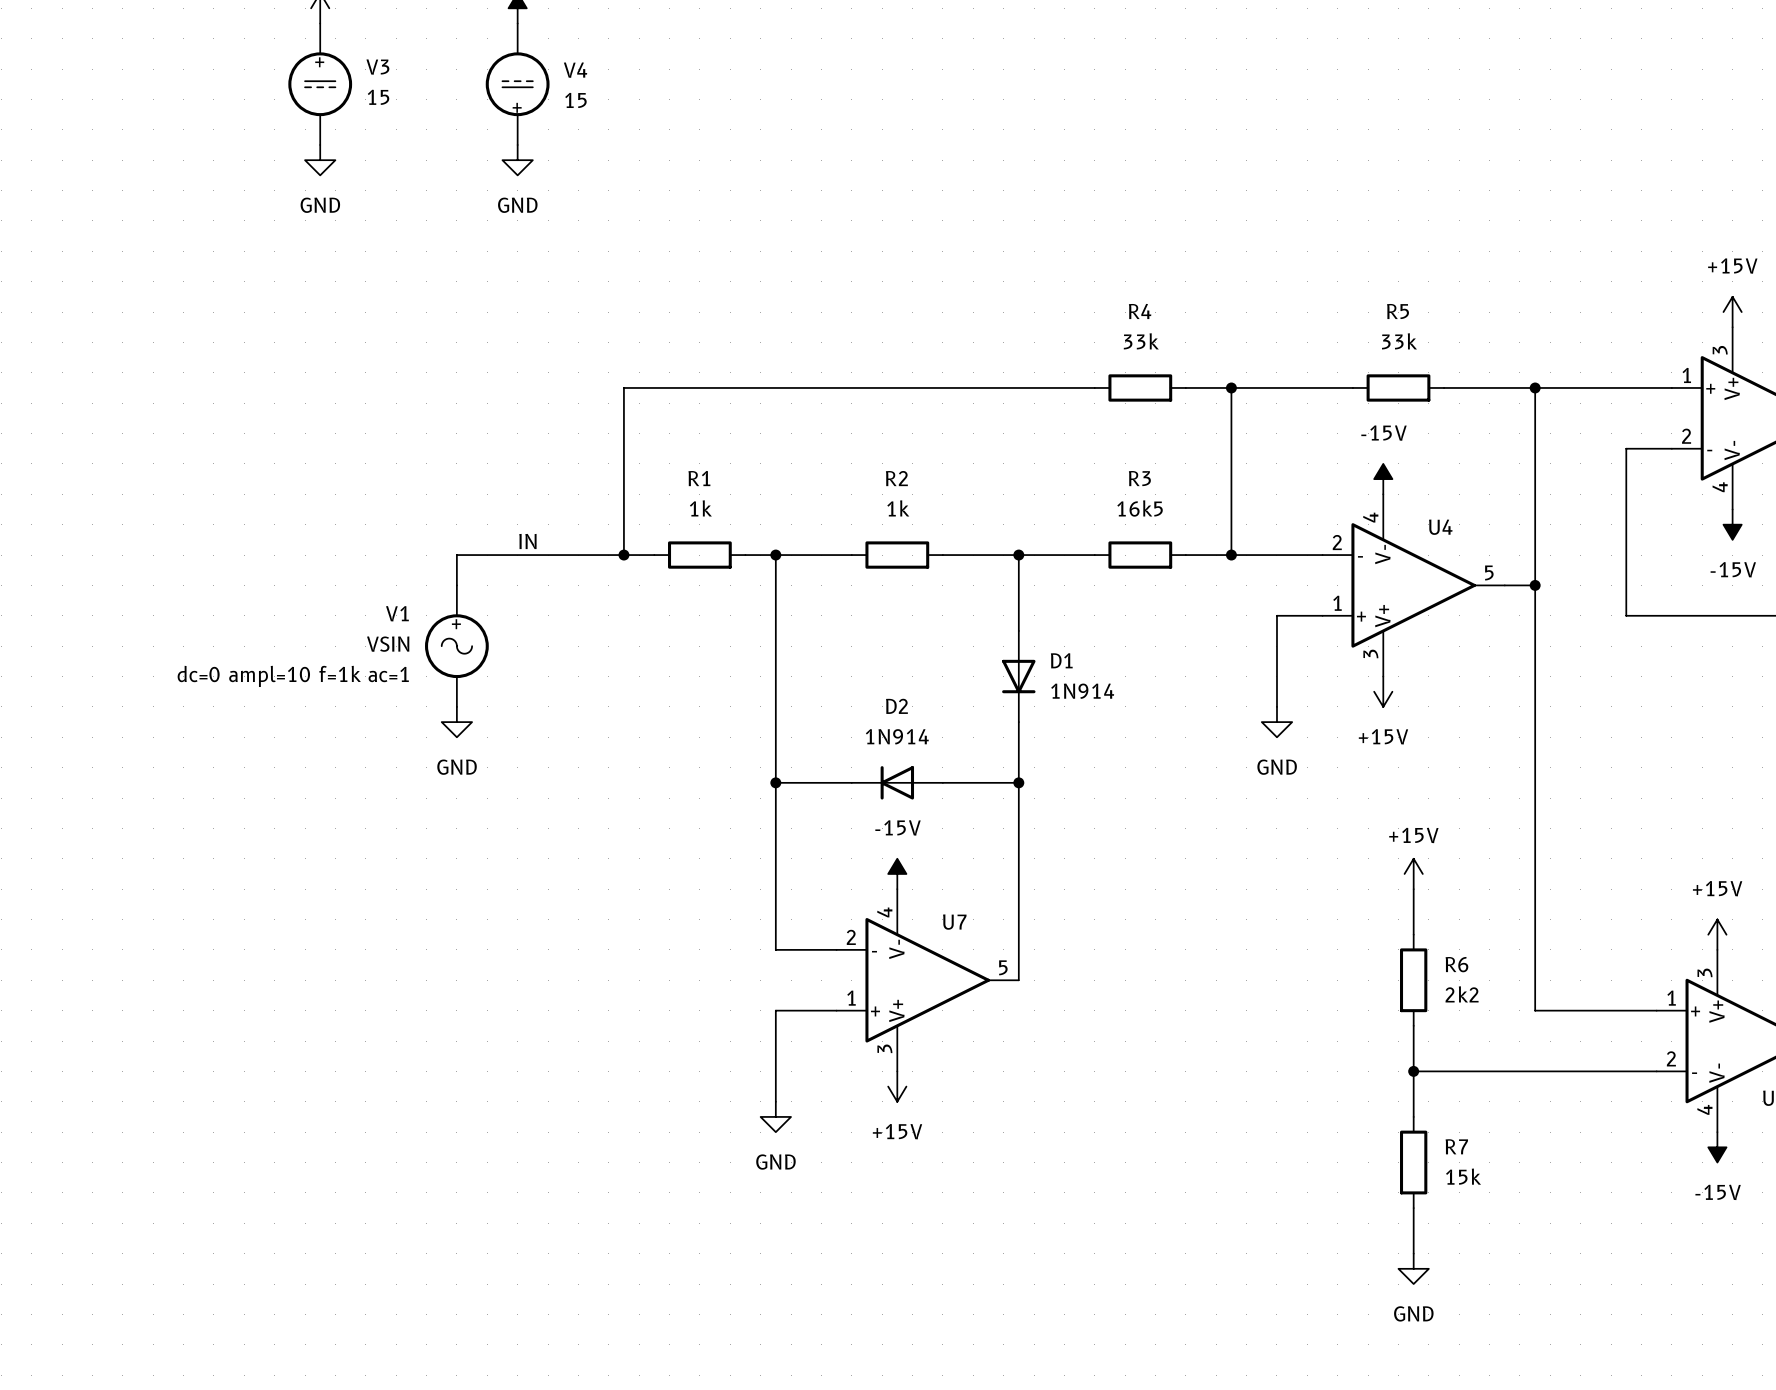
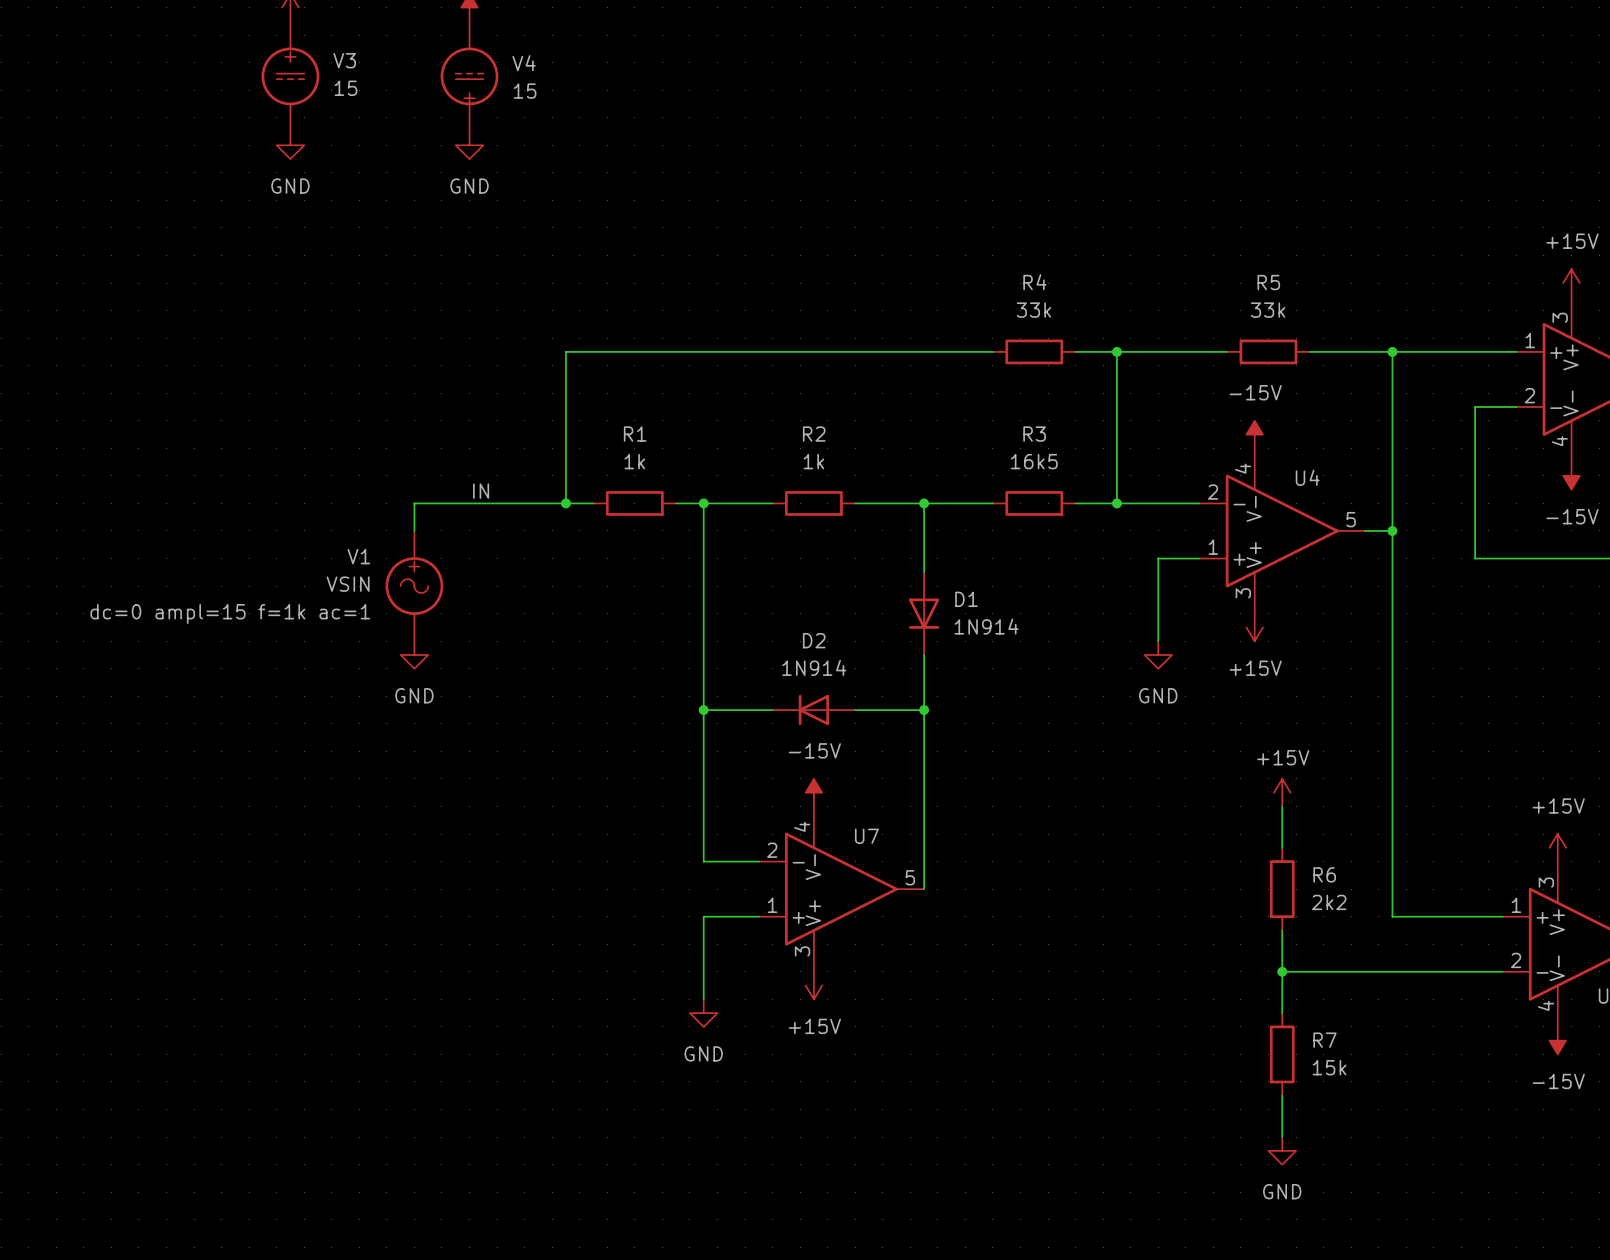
V1 text: dc=0 ampl=10 f=1k ac=1 (293, 676) -> dc=0 ampl=15 f=1k ac=1 (230, 614)

